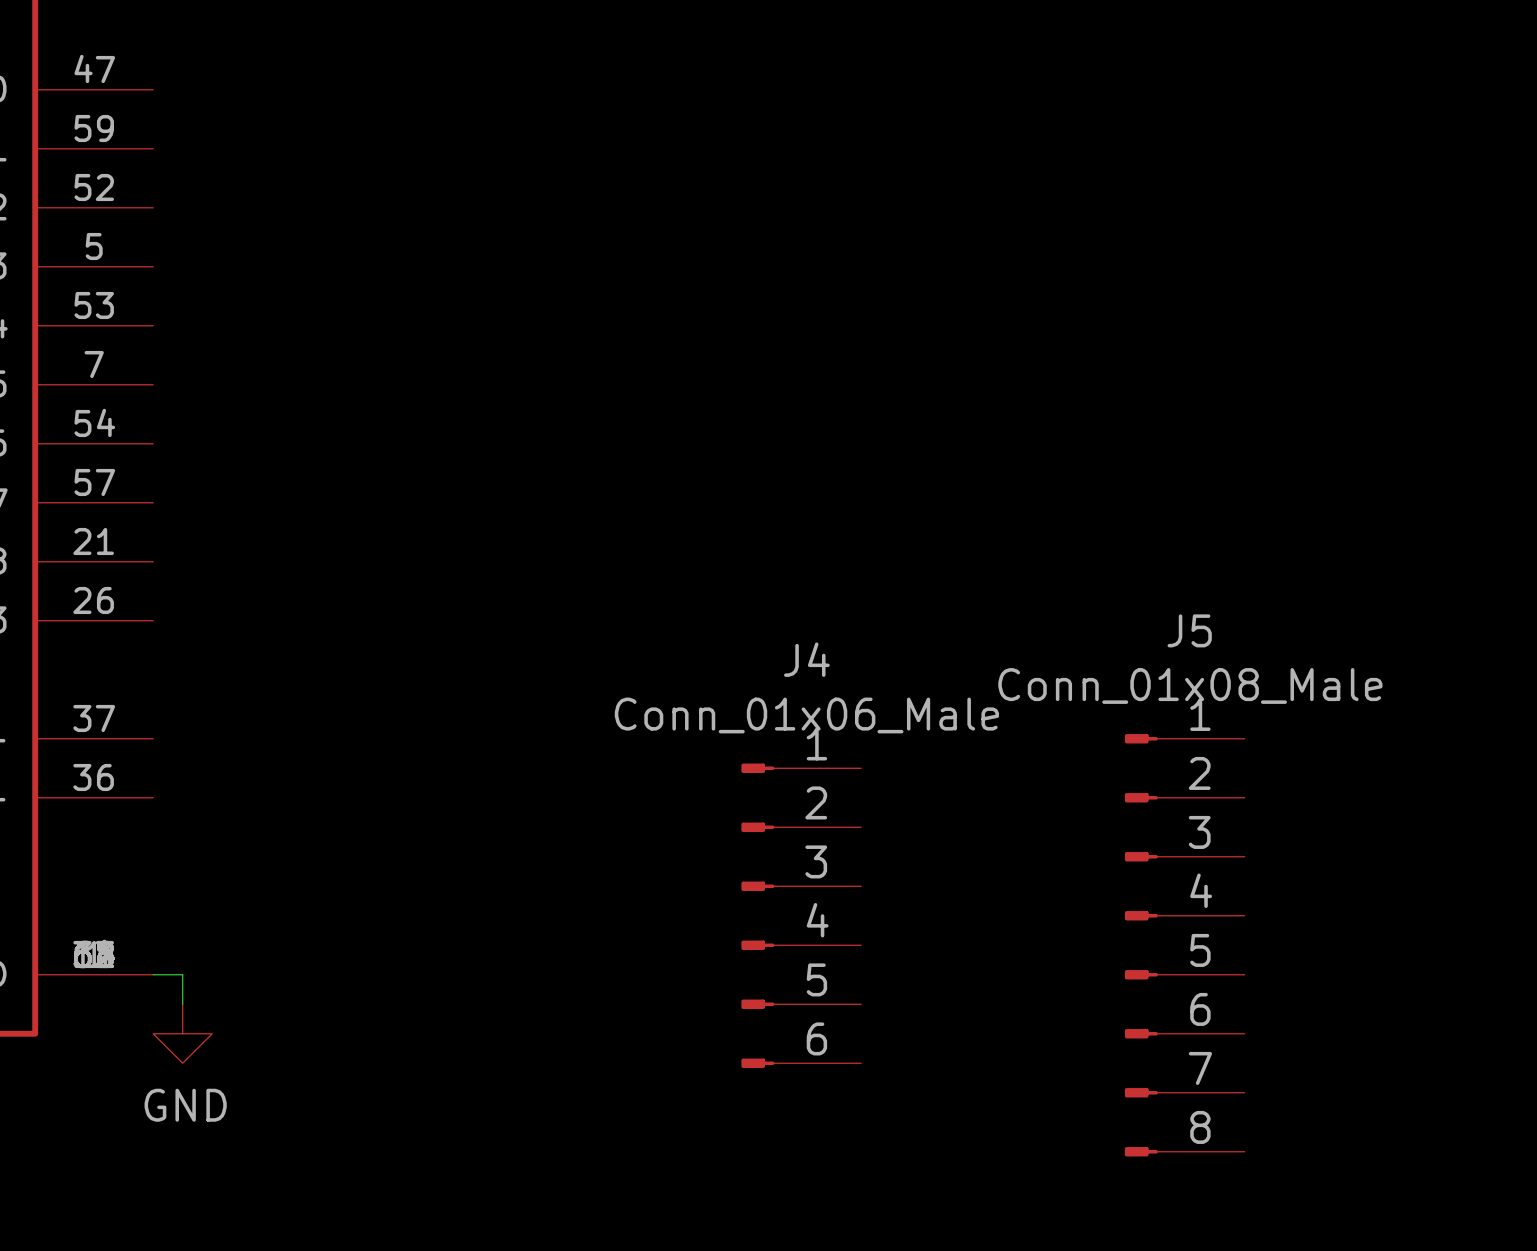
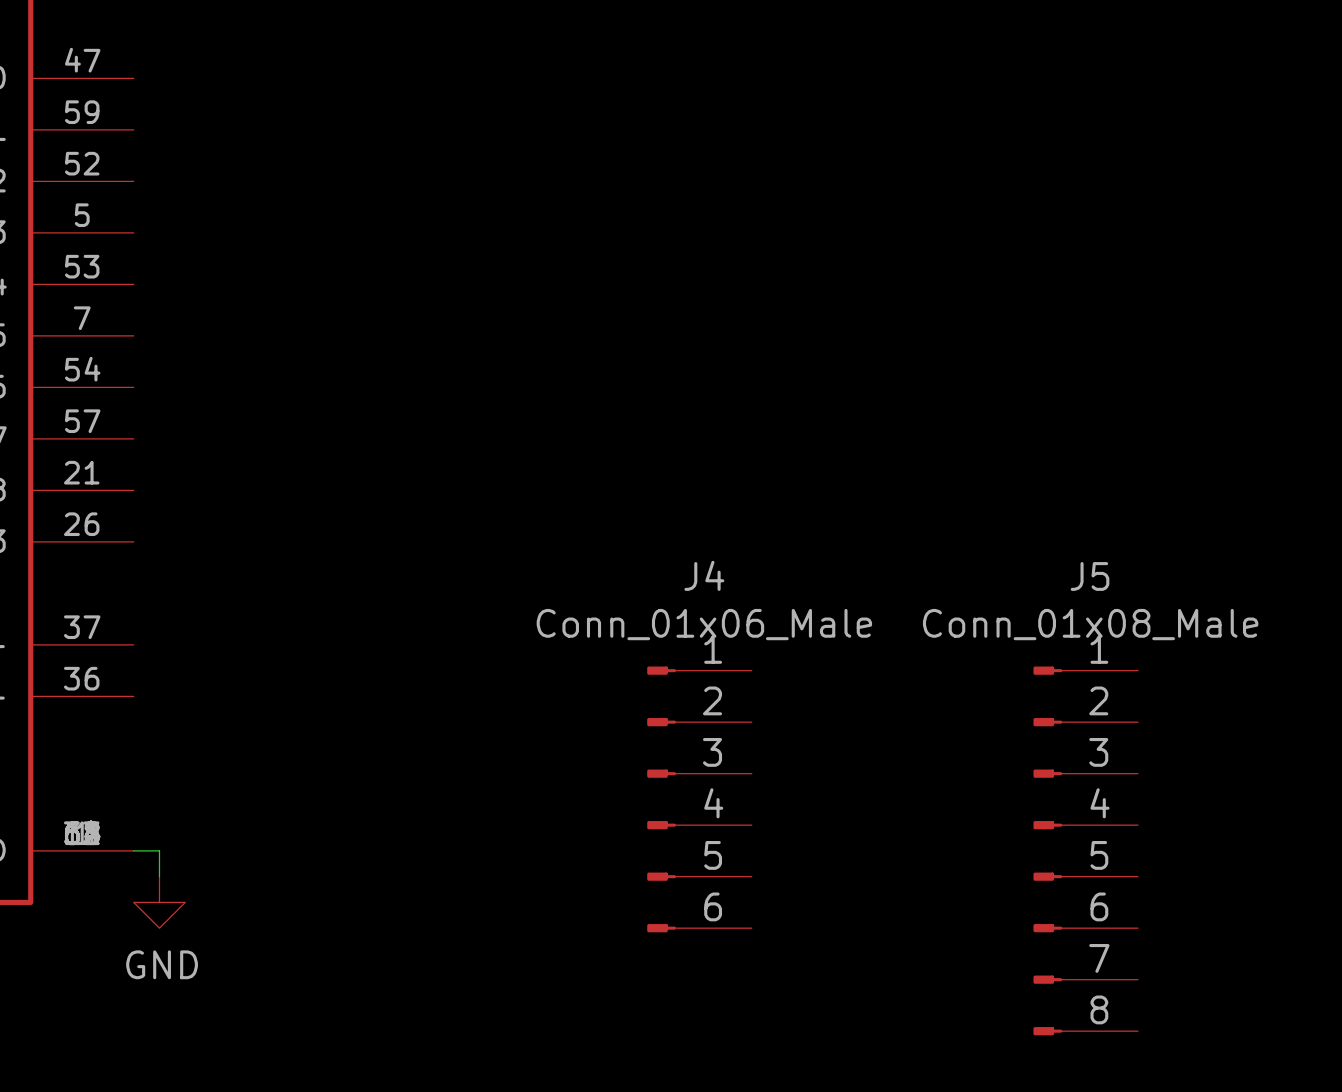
J5 position: (1184, 945) -> (1085, 850)

